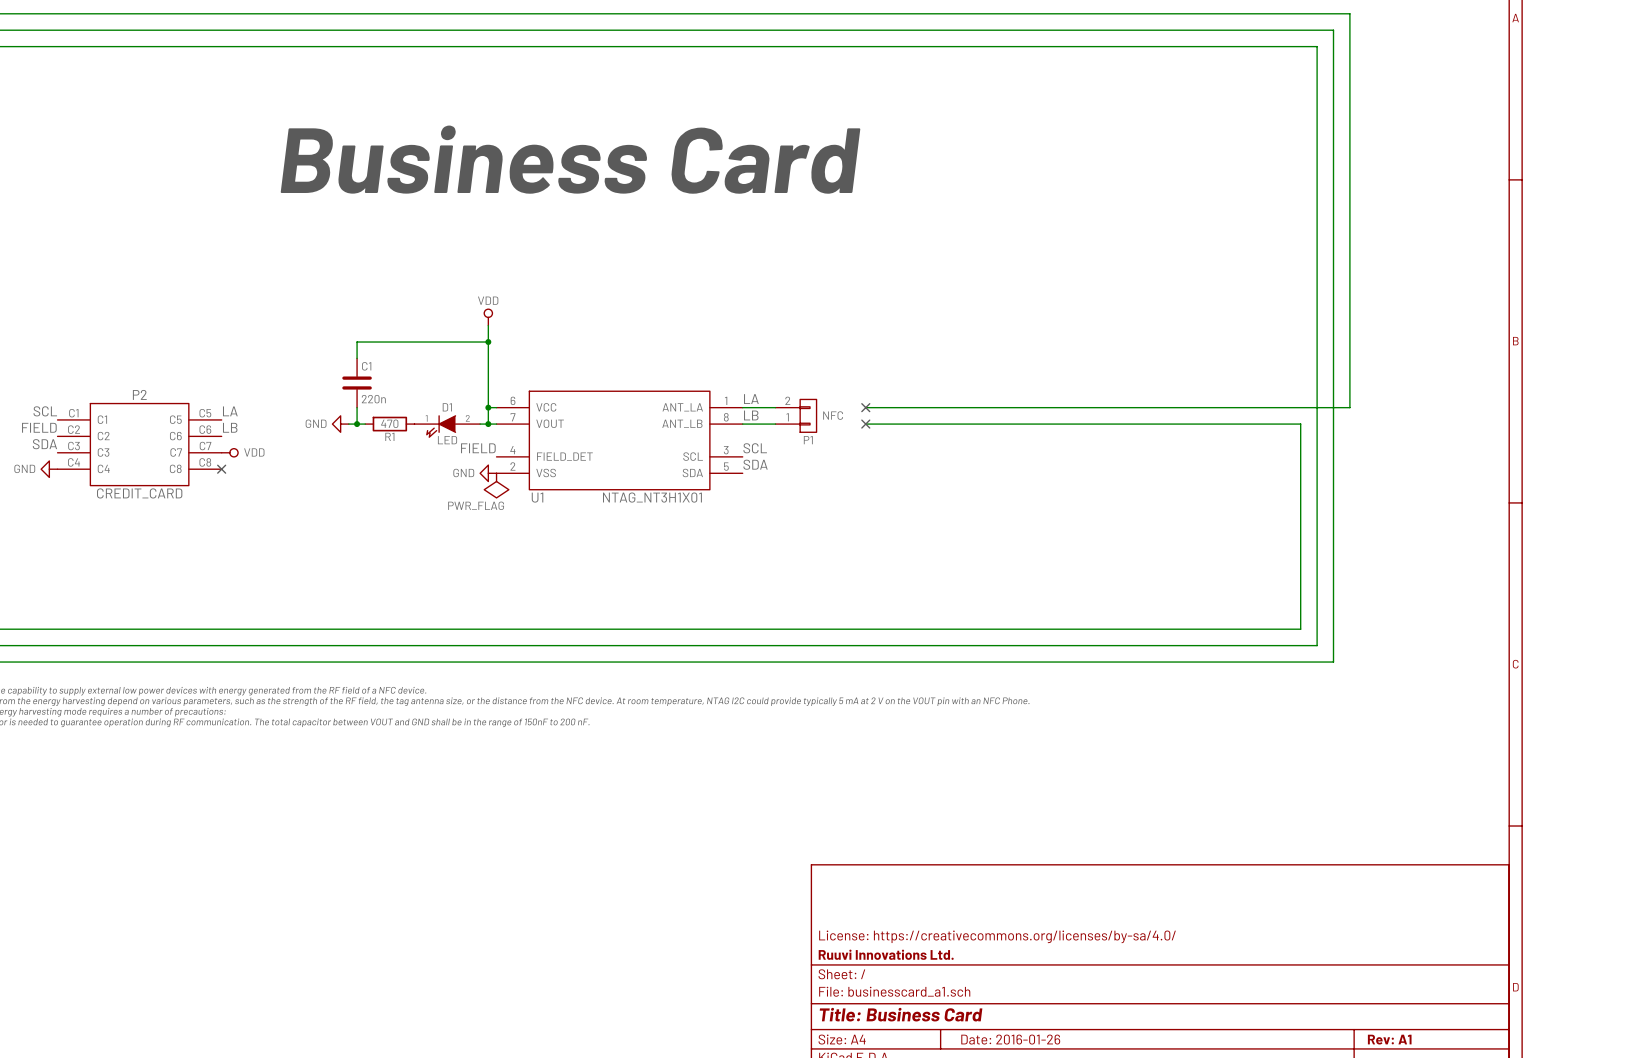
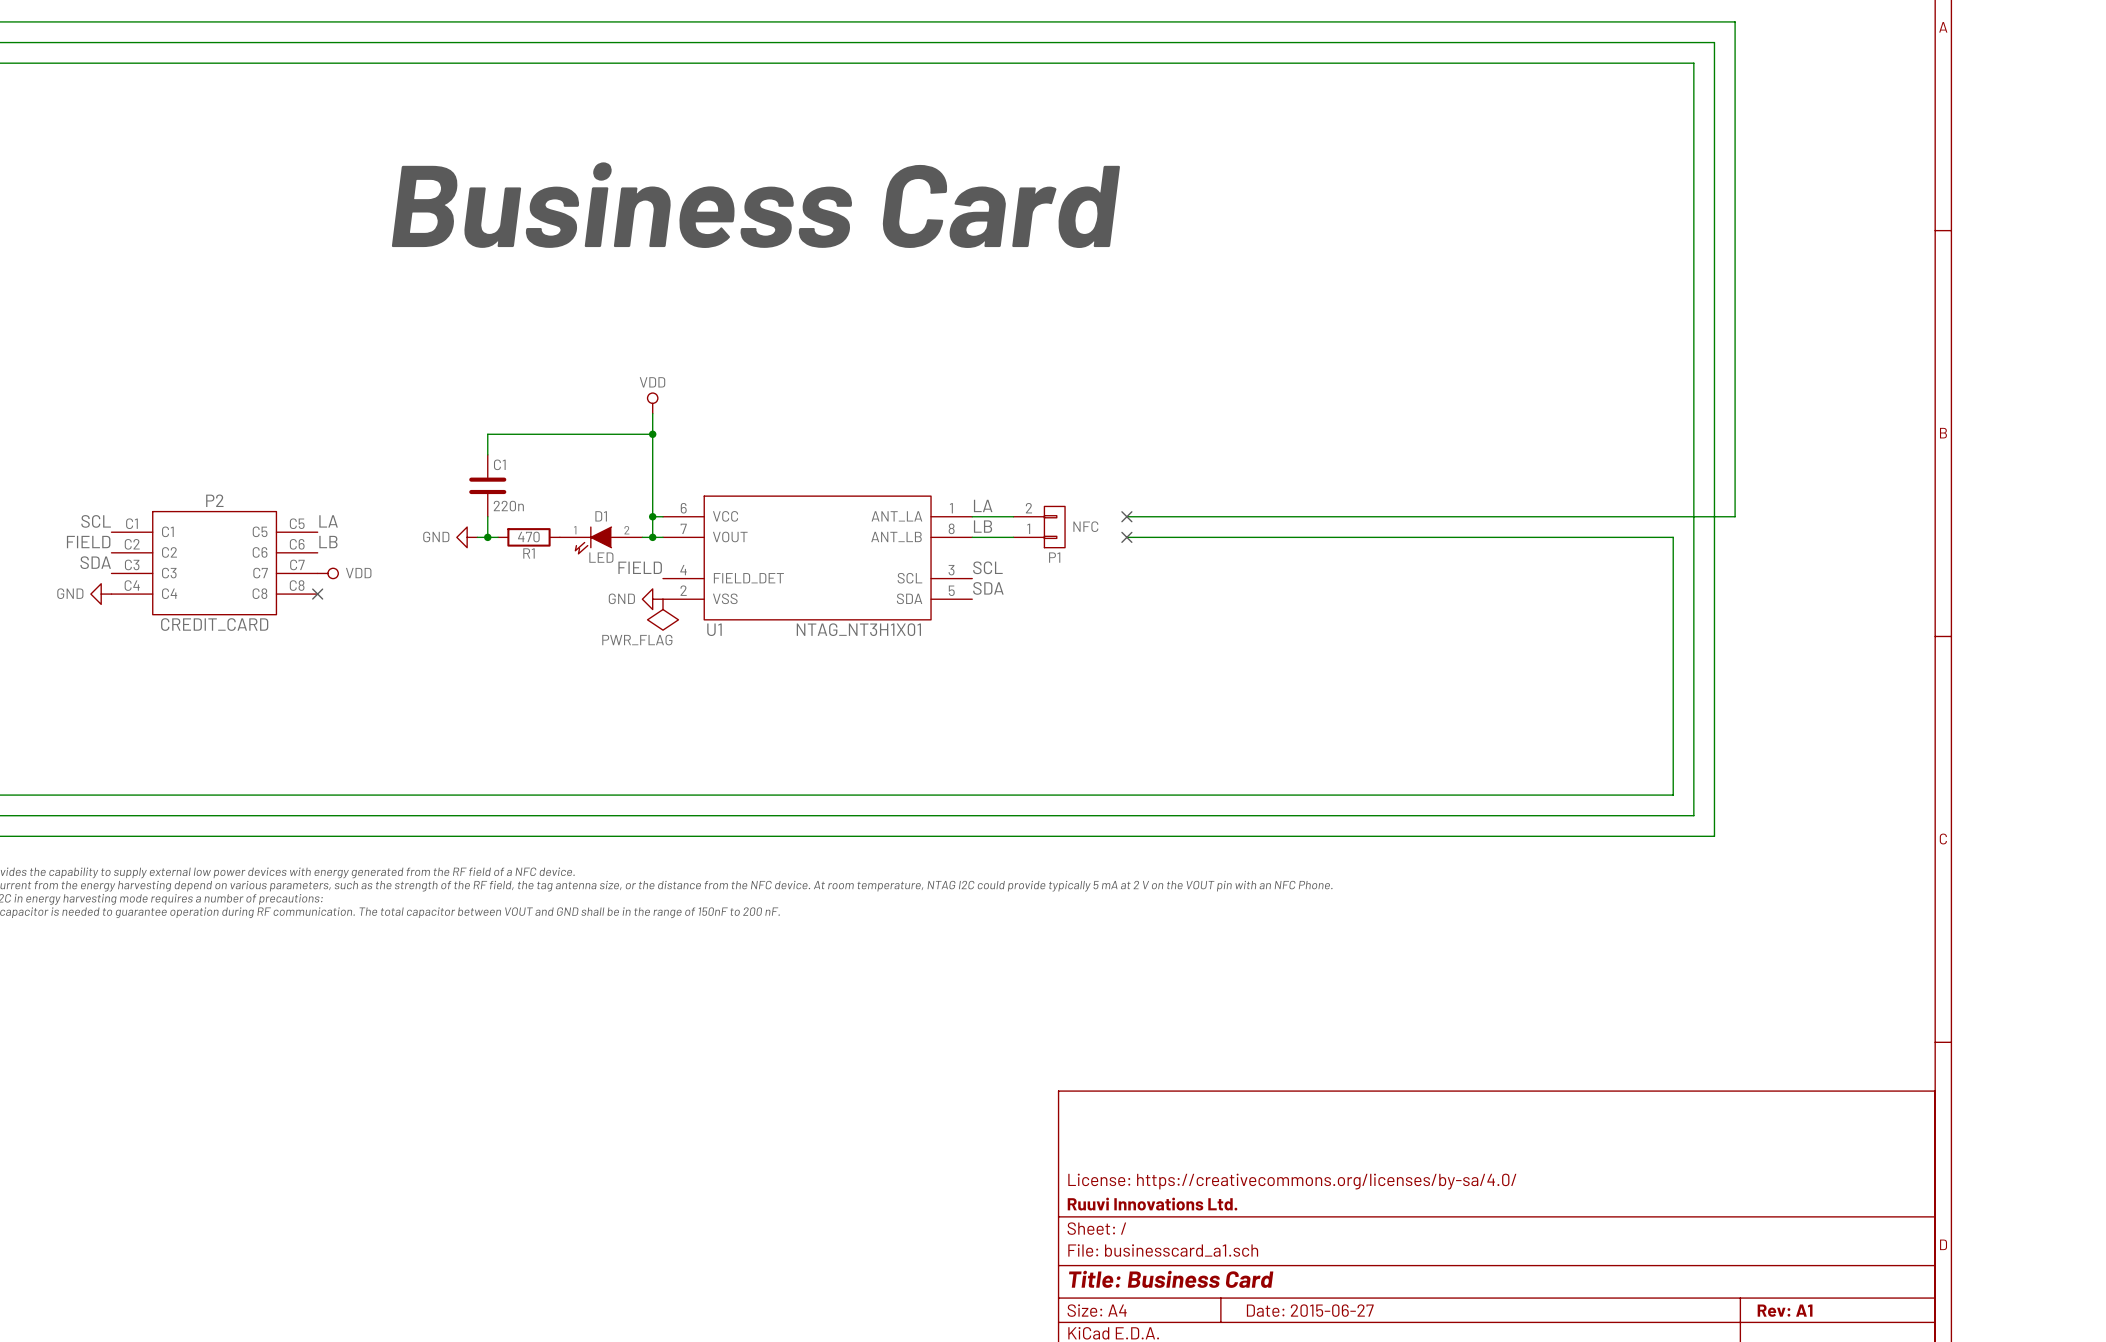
title block: Date: 2016-01-26 (1010, 1039) -> Date: 2015-06-27 (1310, 1310)

